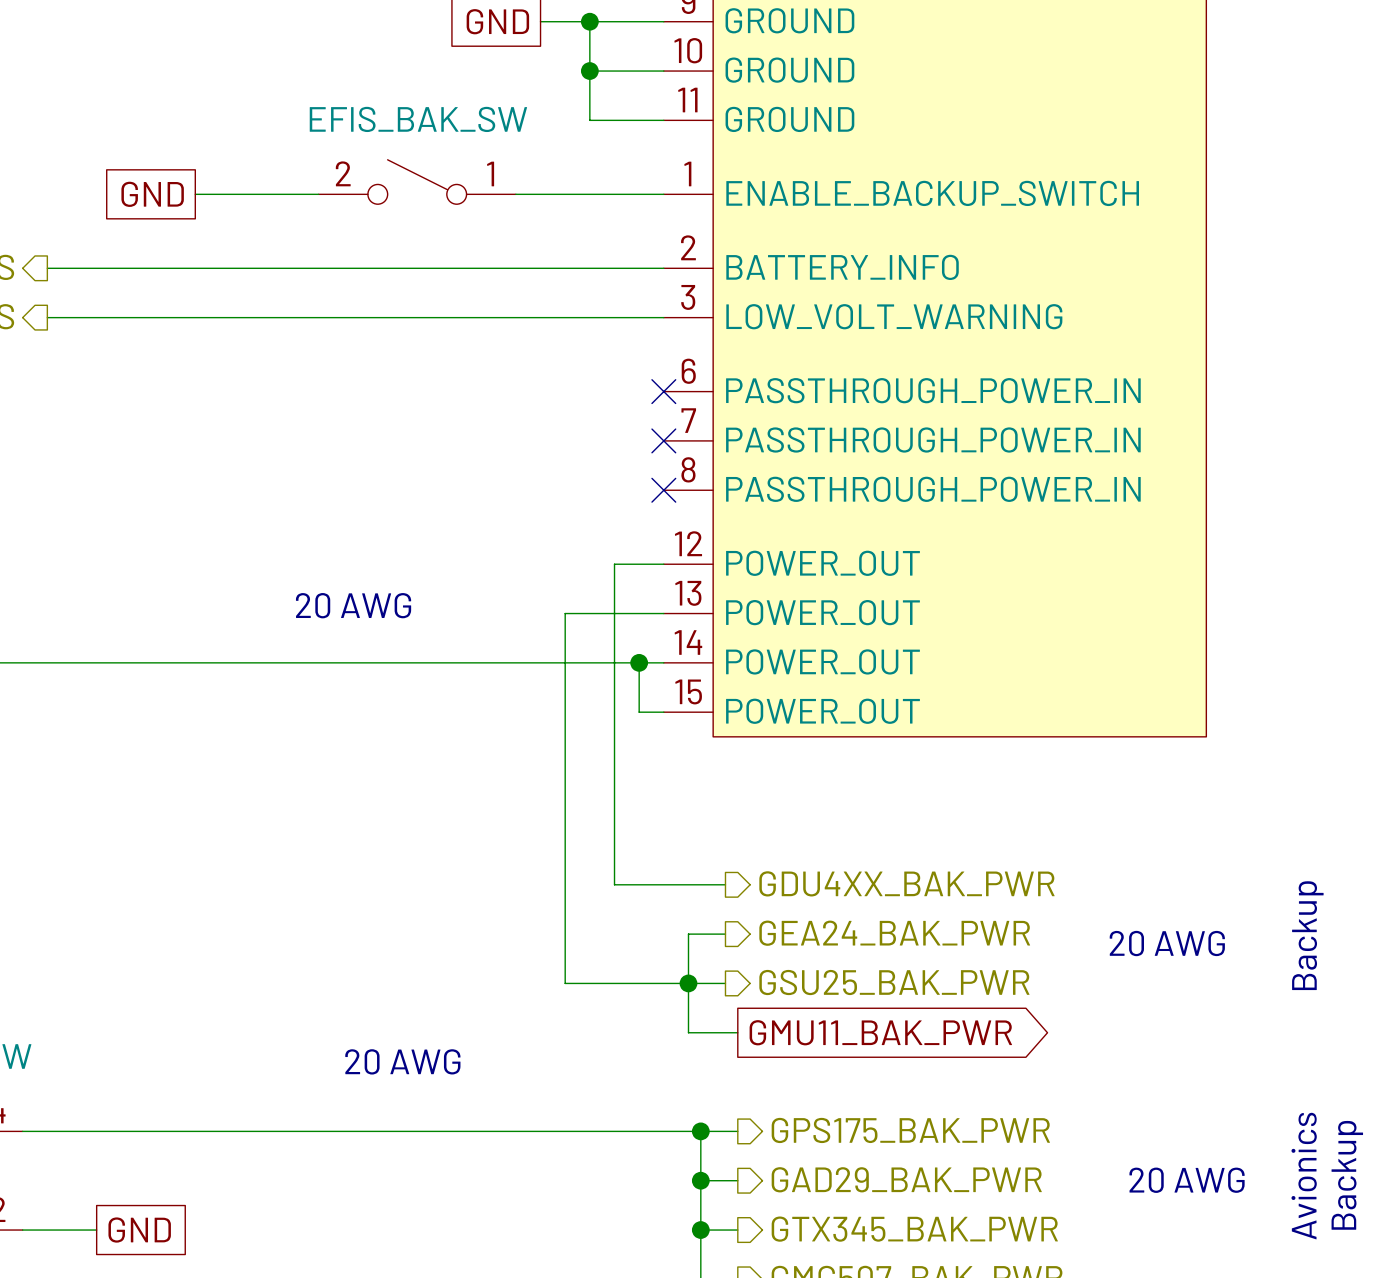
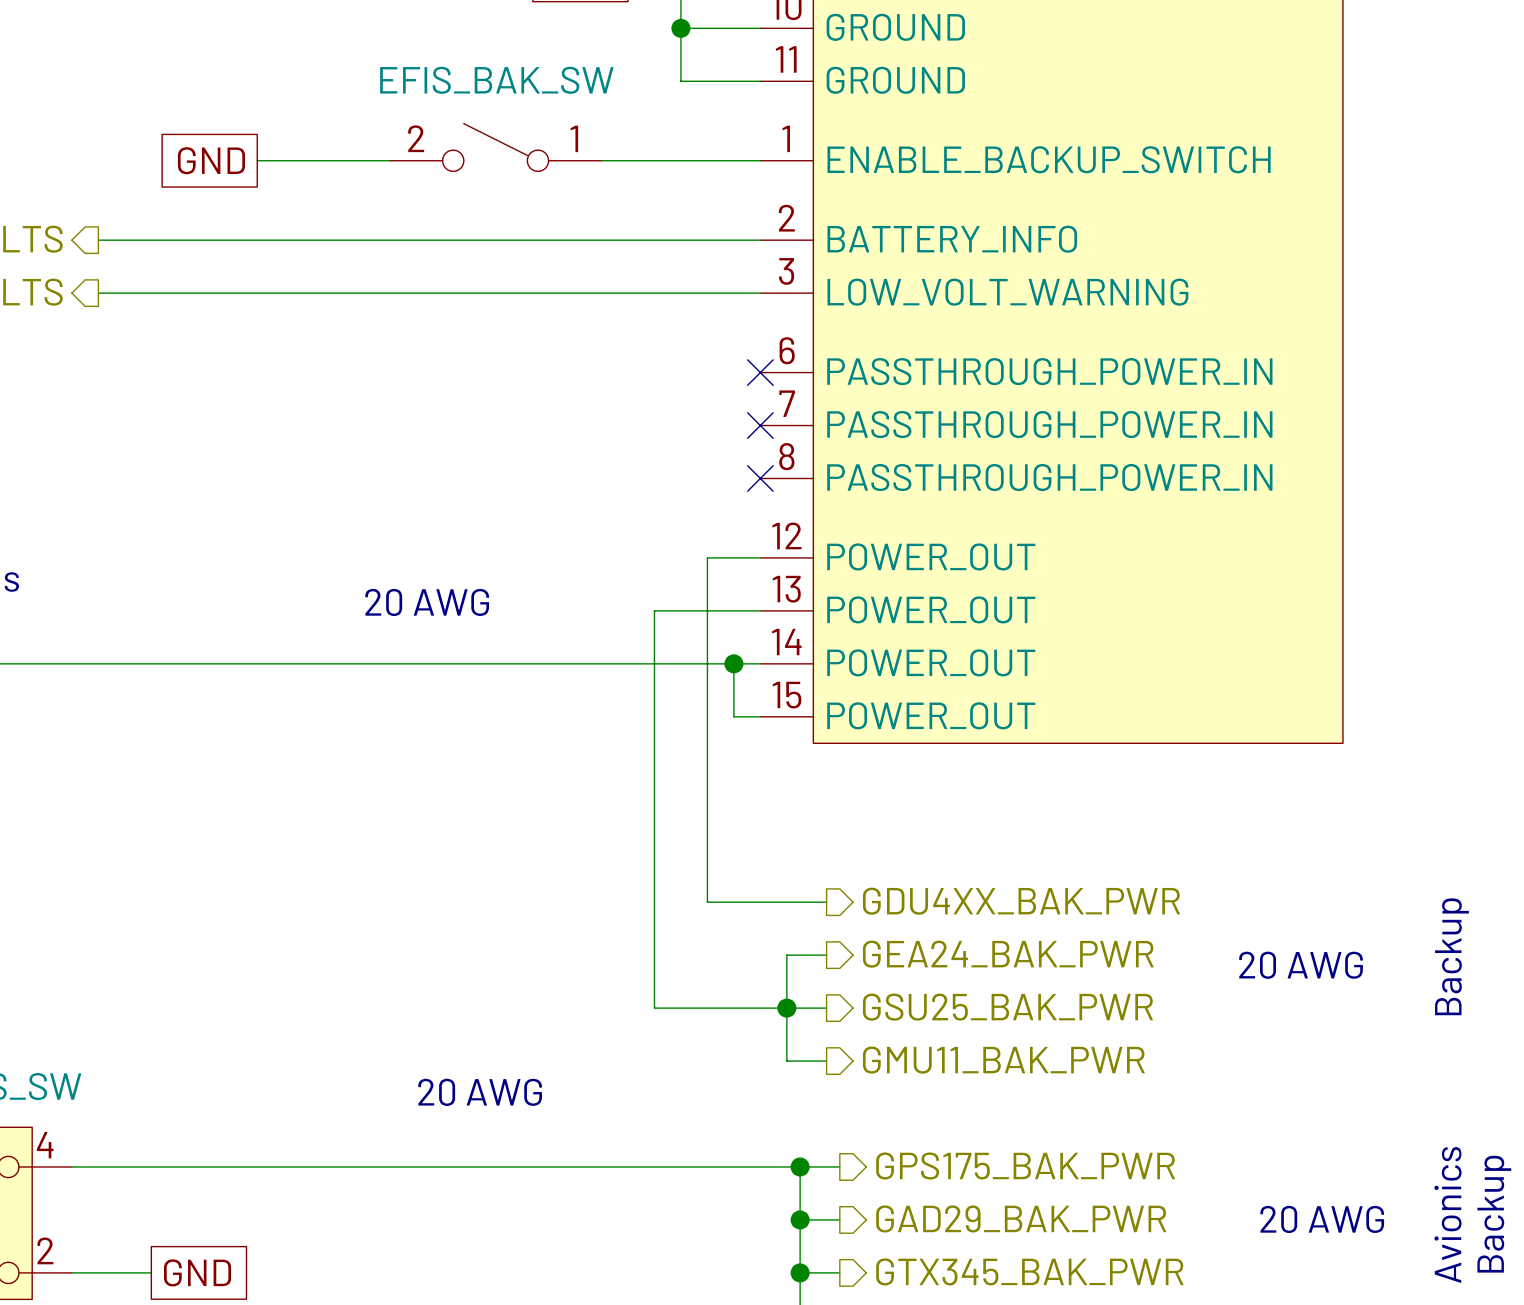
hierarchical label: none -> GMU11_BAK_PWR (1003, 1060)
wire: (725, 1032) (737, 1032) -> none
global label: GMU11_BAK_PWR (880, 1032) -> none

